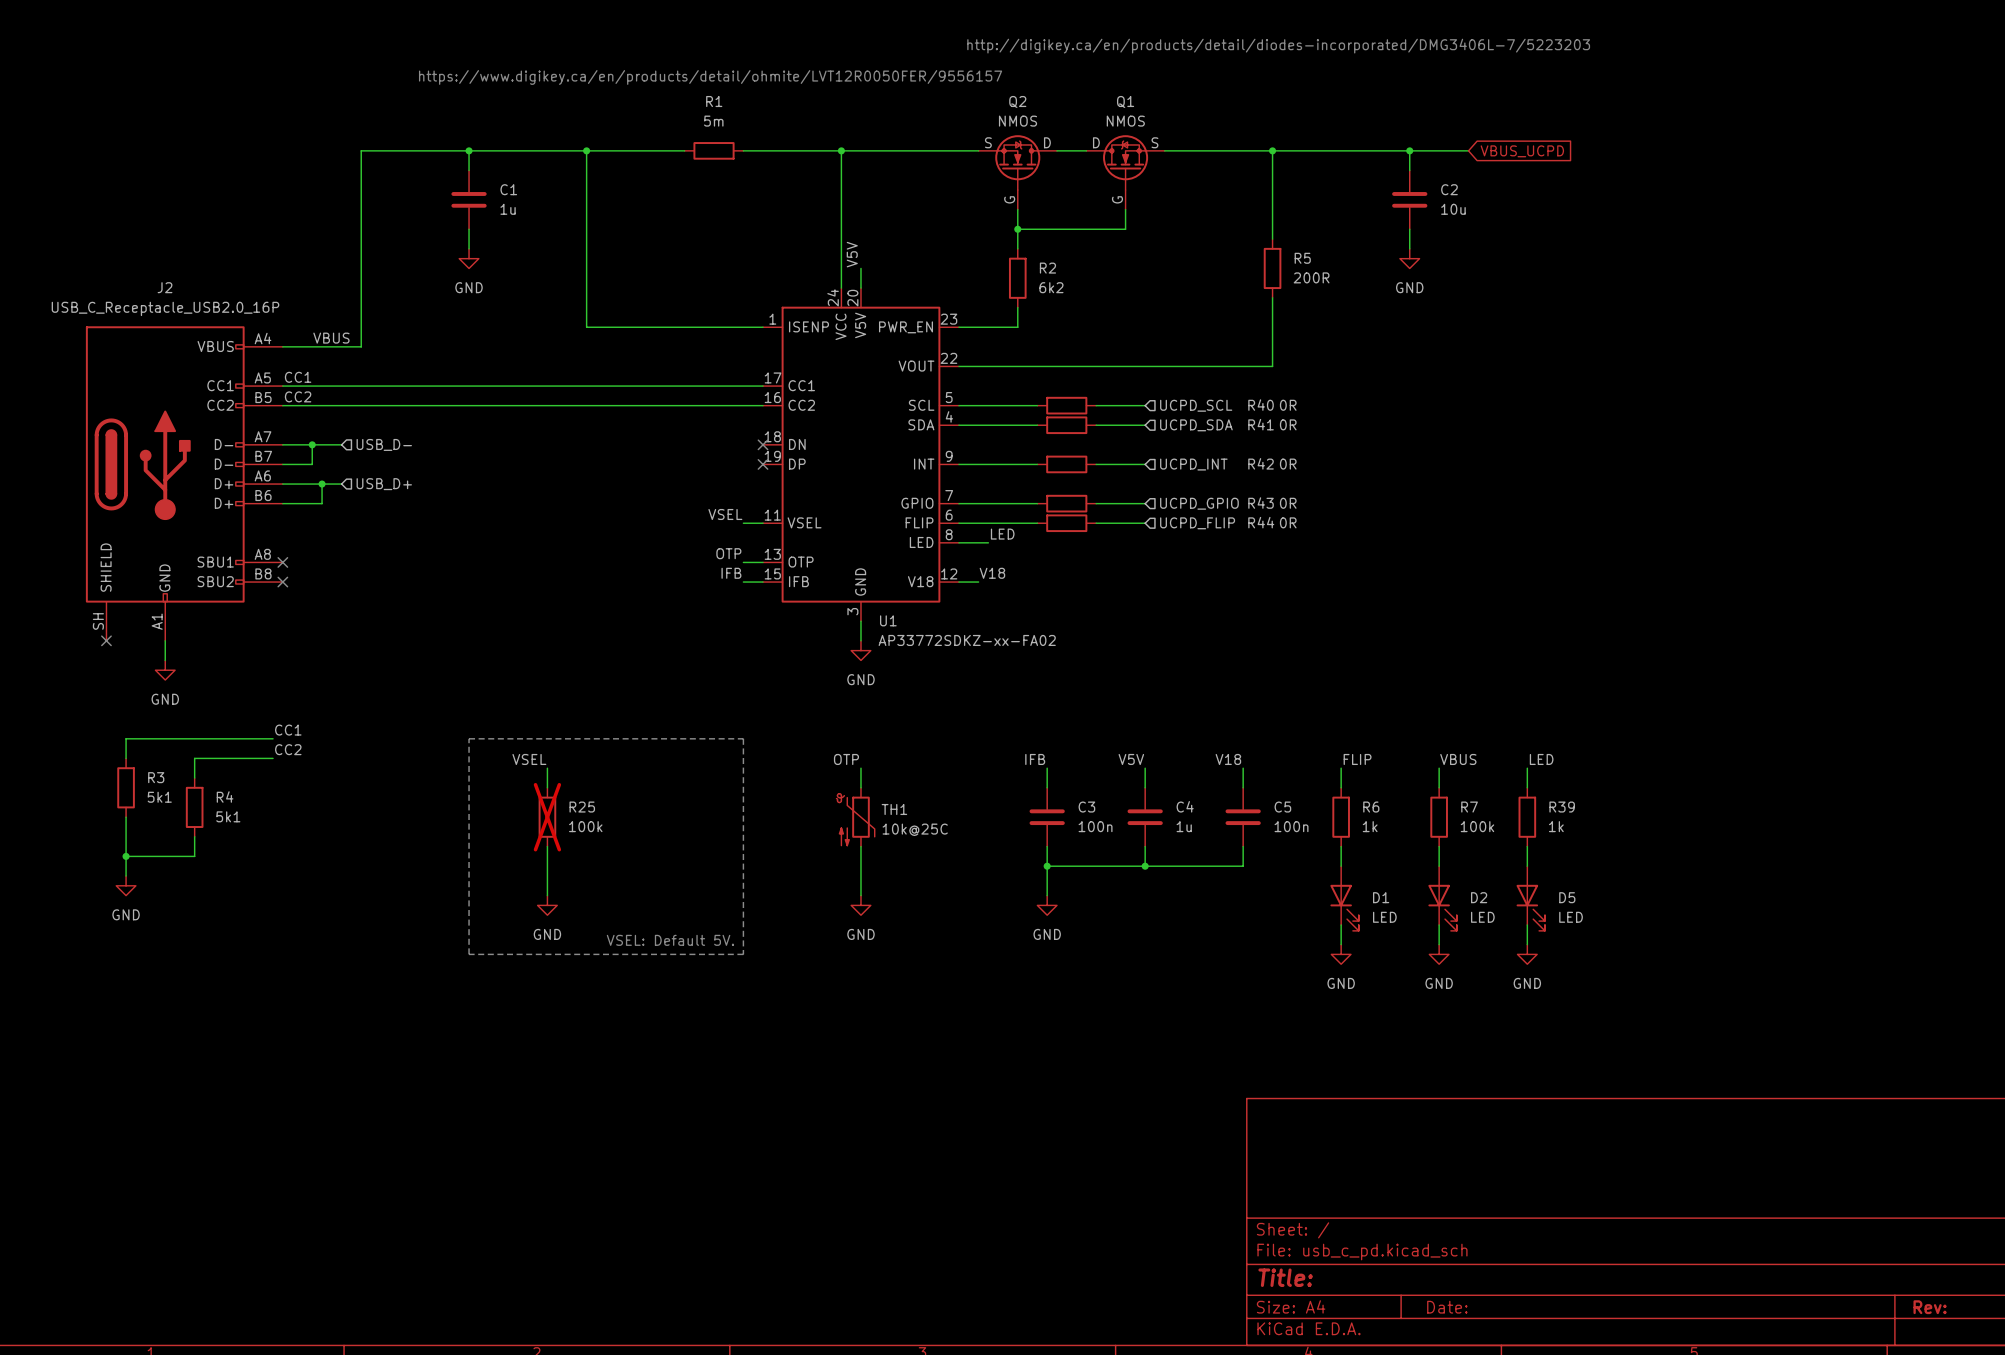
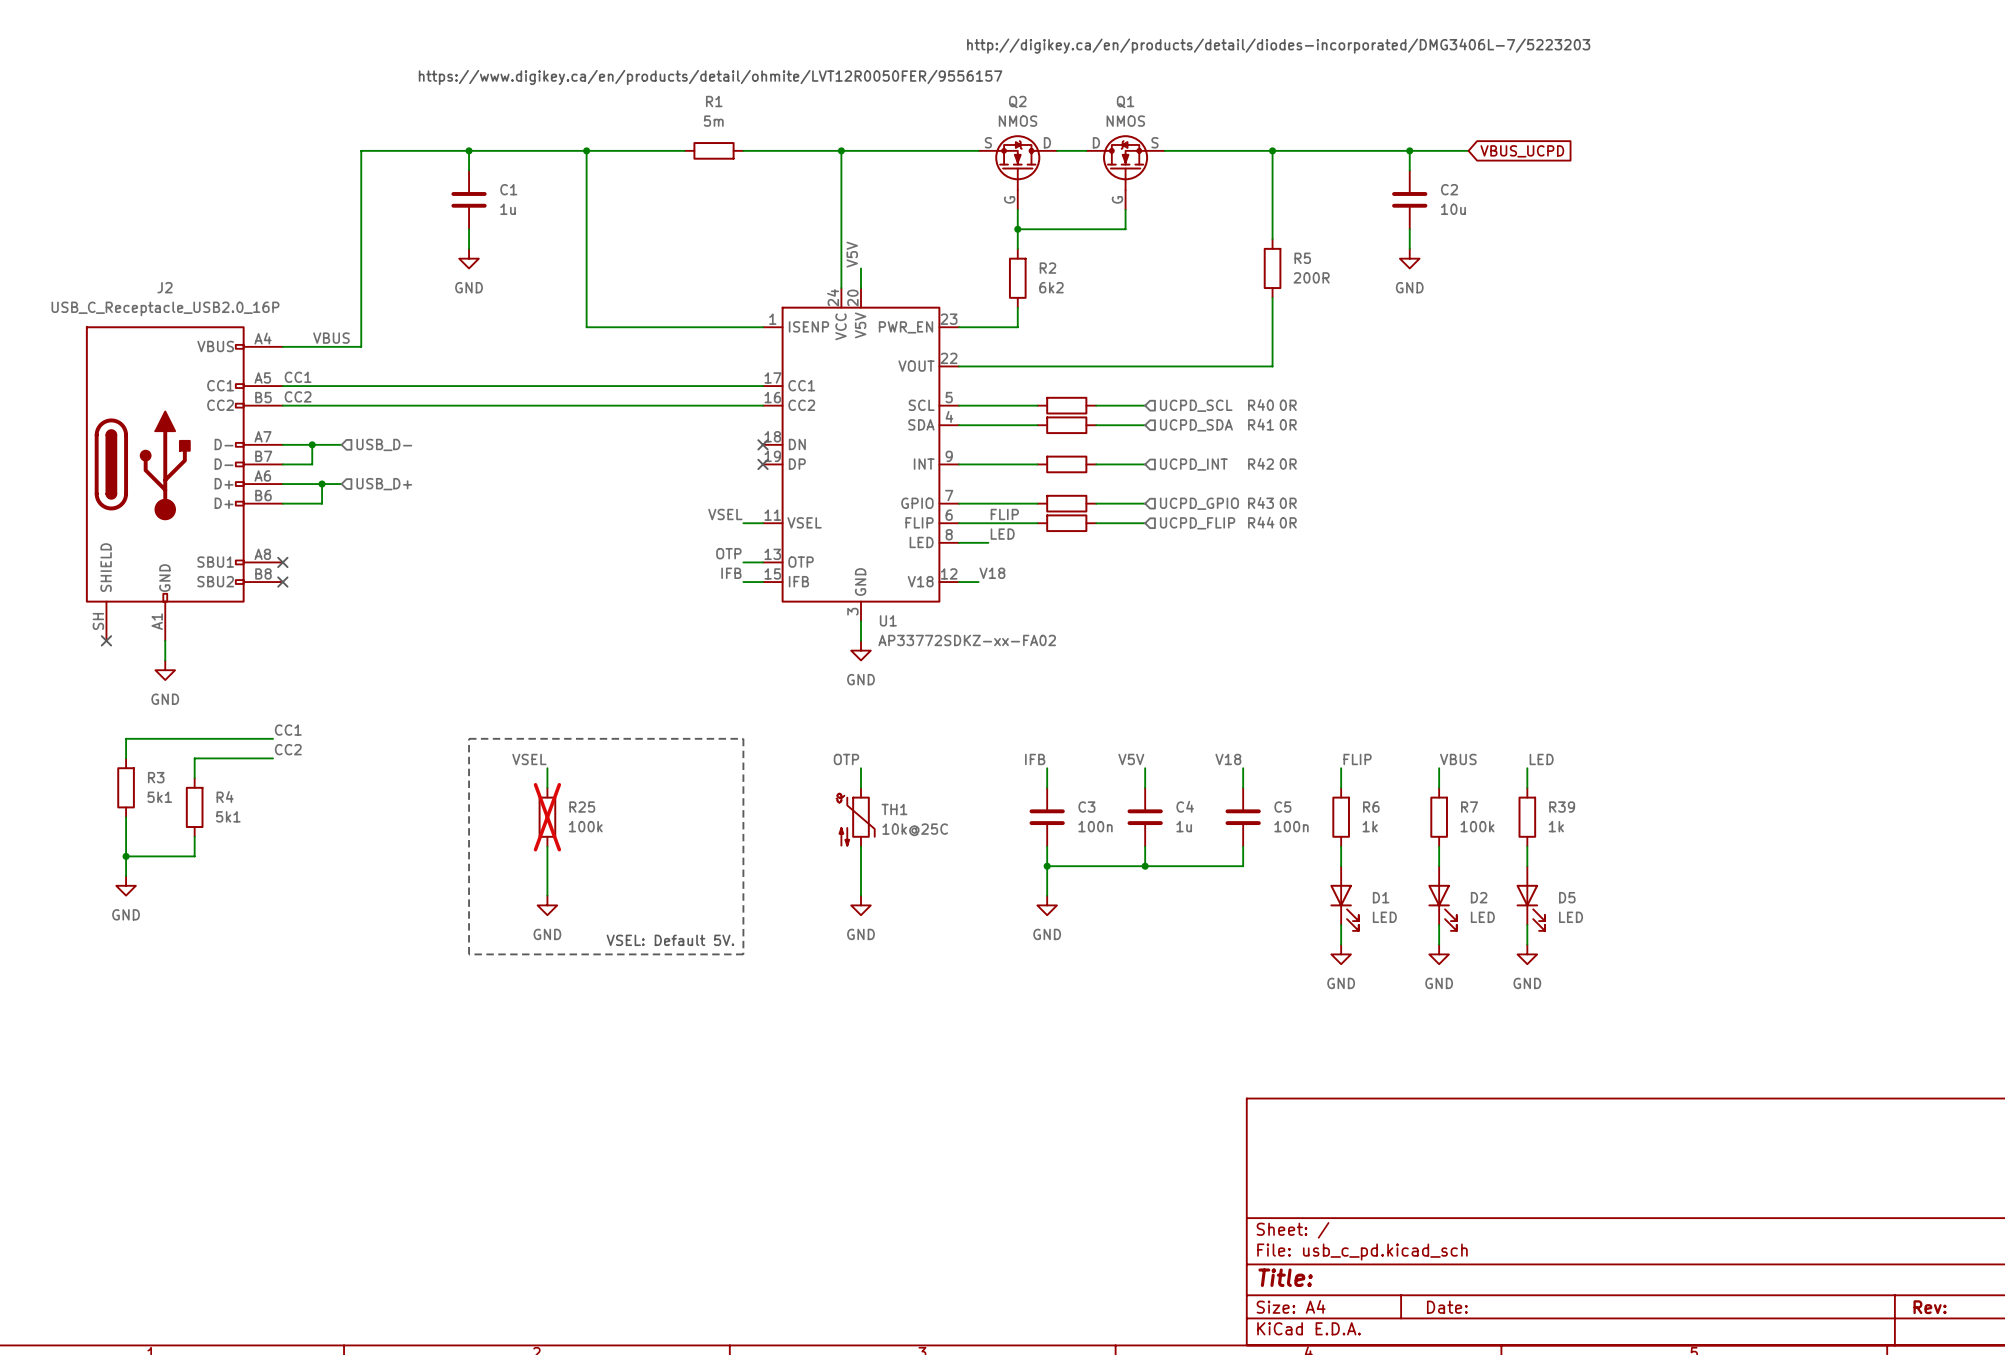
label: none -> FLIP (1004, 514)

